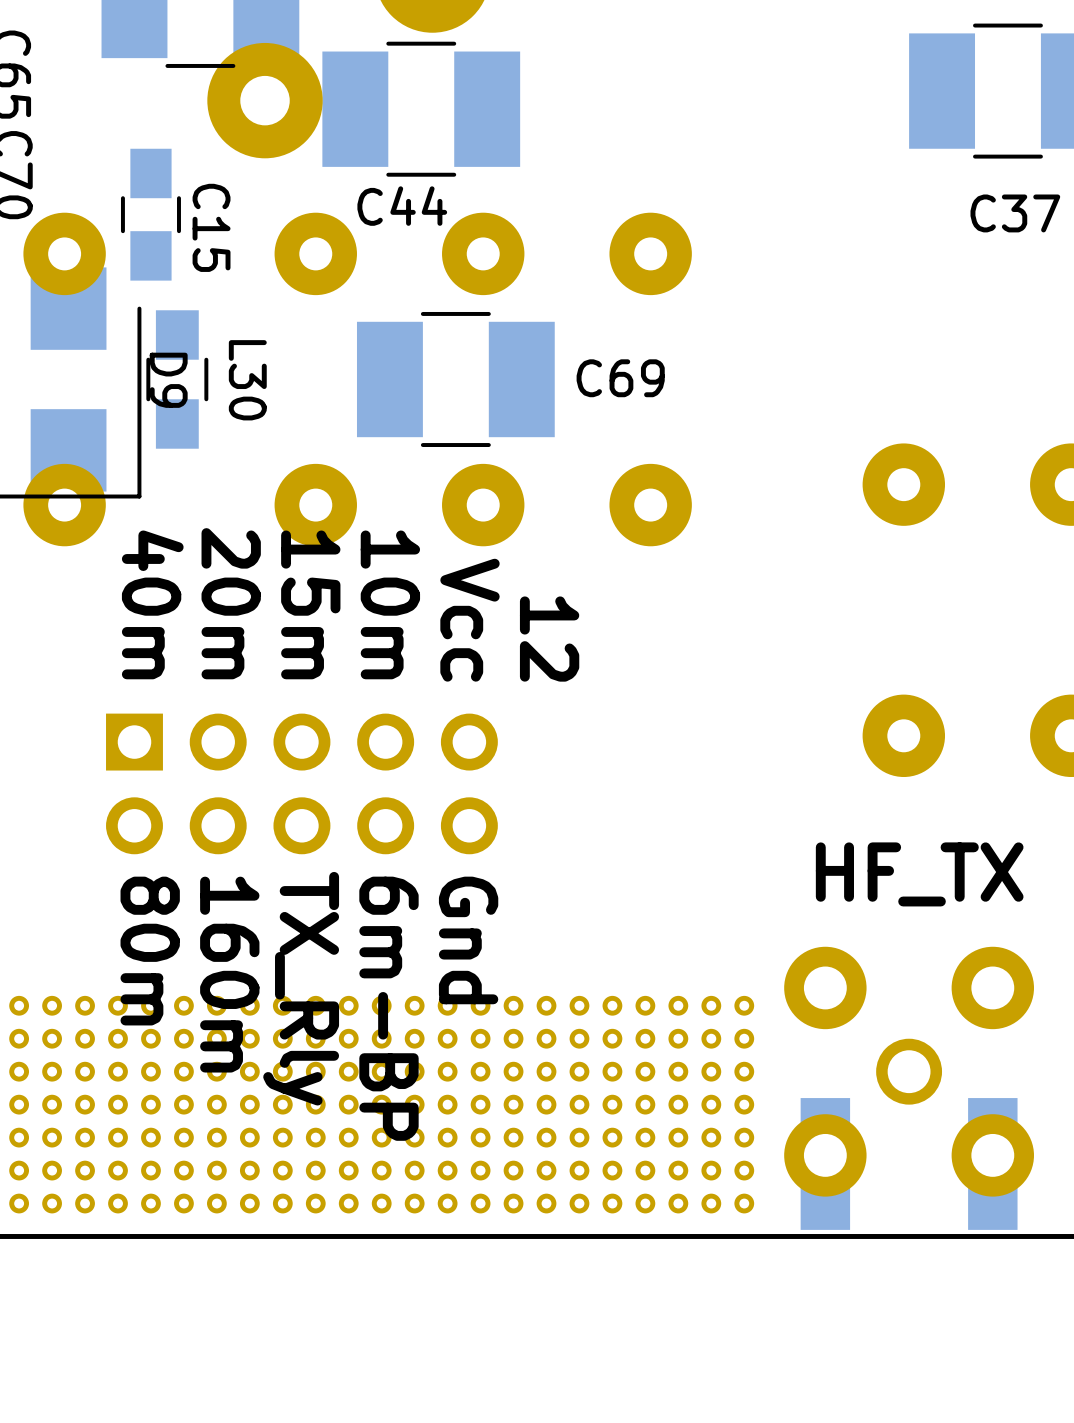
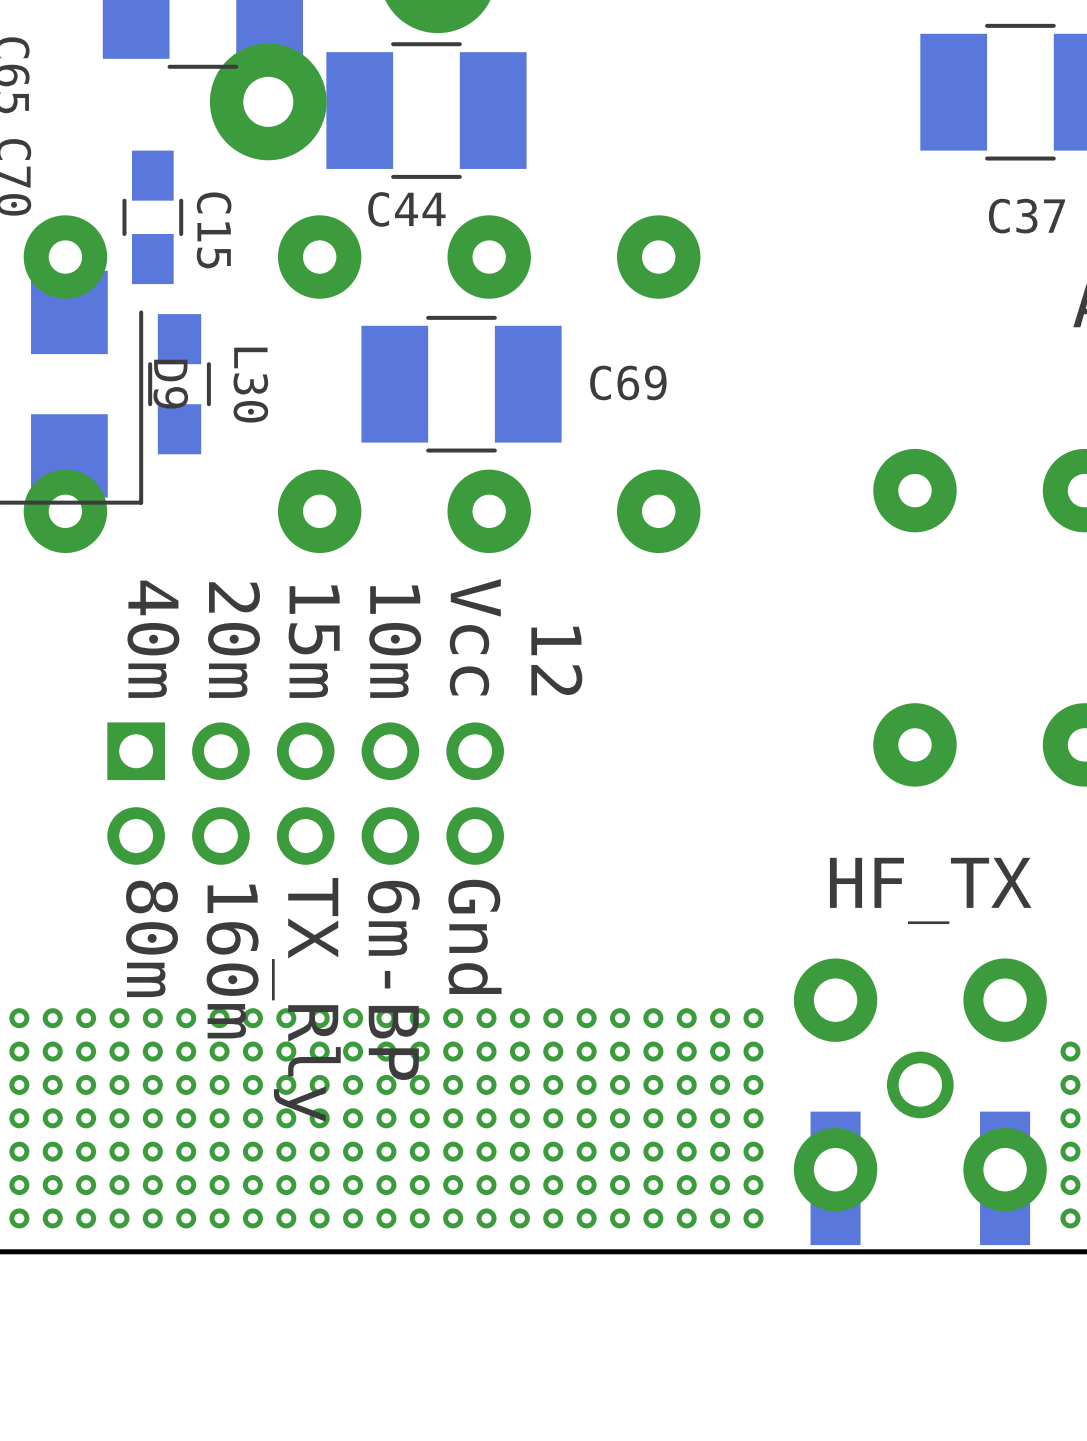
part: none -> (1070, 1051)
part: none -> (1070, 1084)
part: none -> (1070, 1118)
part: none -> (1070, 1151)
part: none -> (1070, 1185)
part: none -> (1070, 1218)

